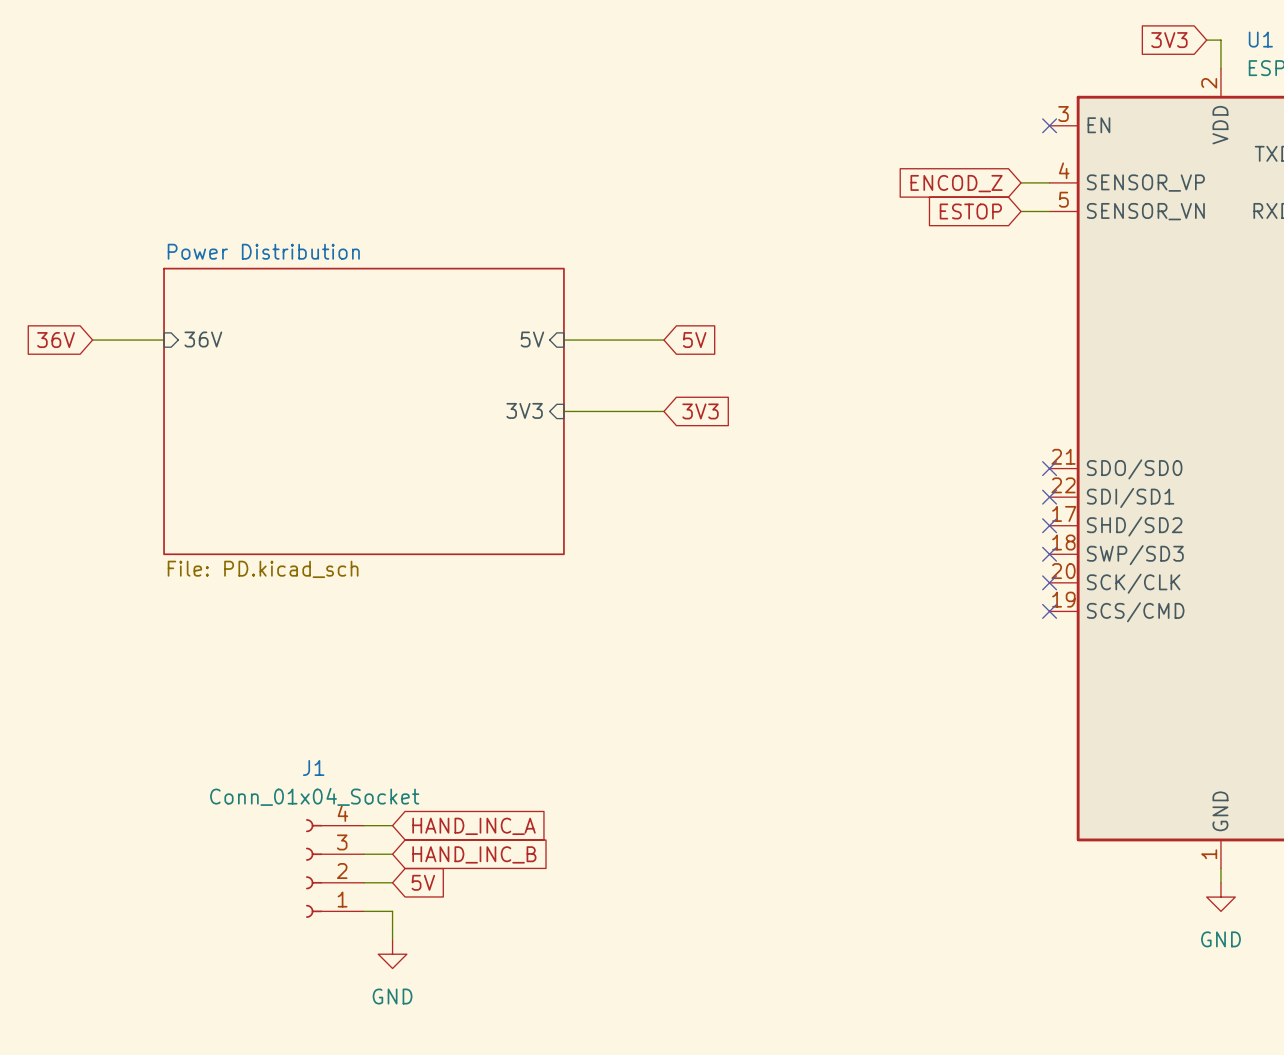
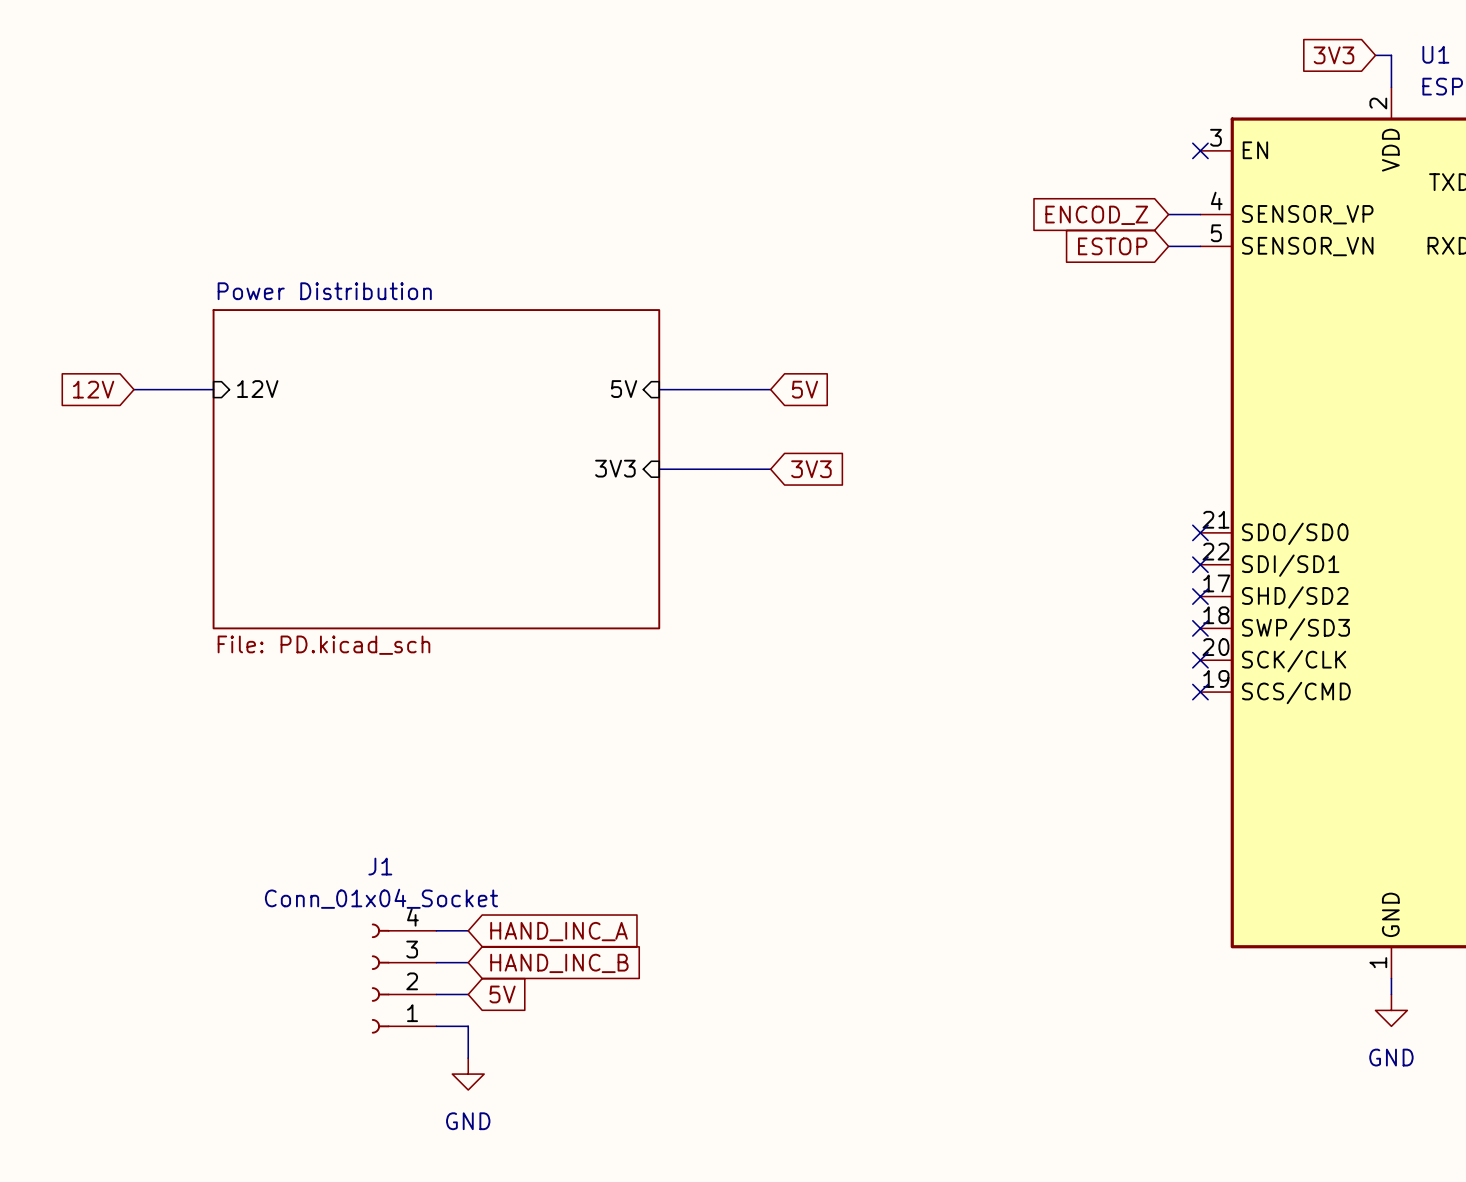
sheet pin: 36V (203, 339) -> 12V (257, 389)
global label: 36V (56, 340) -> 12V (93, 389)

